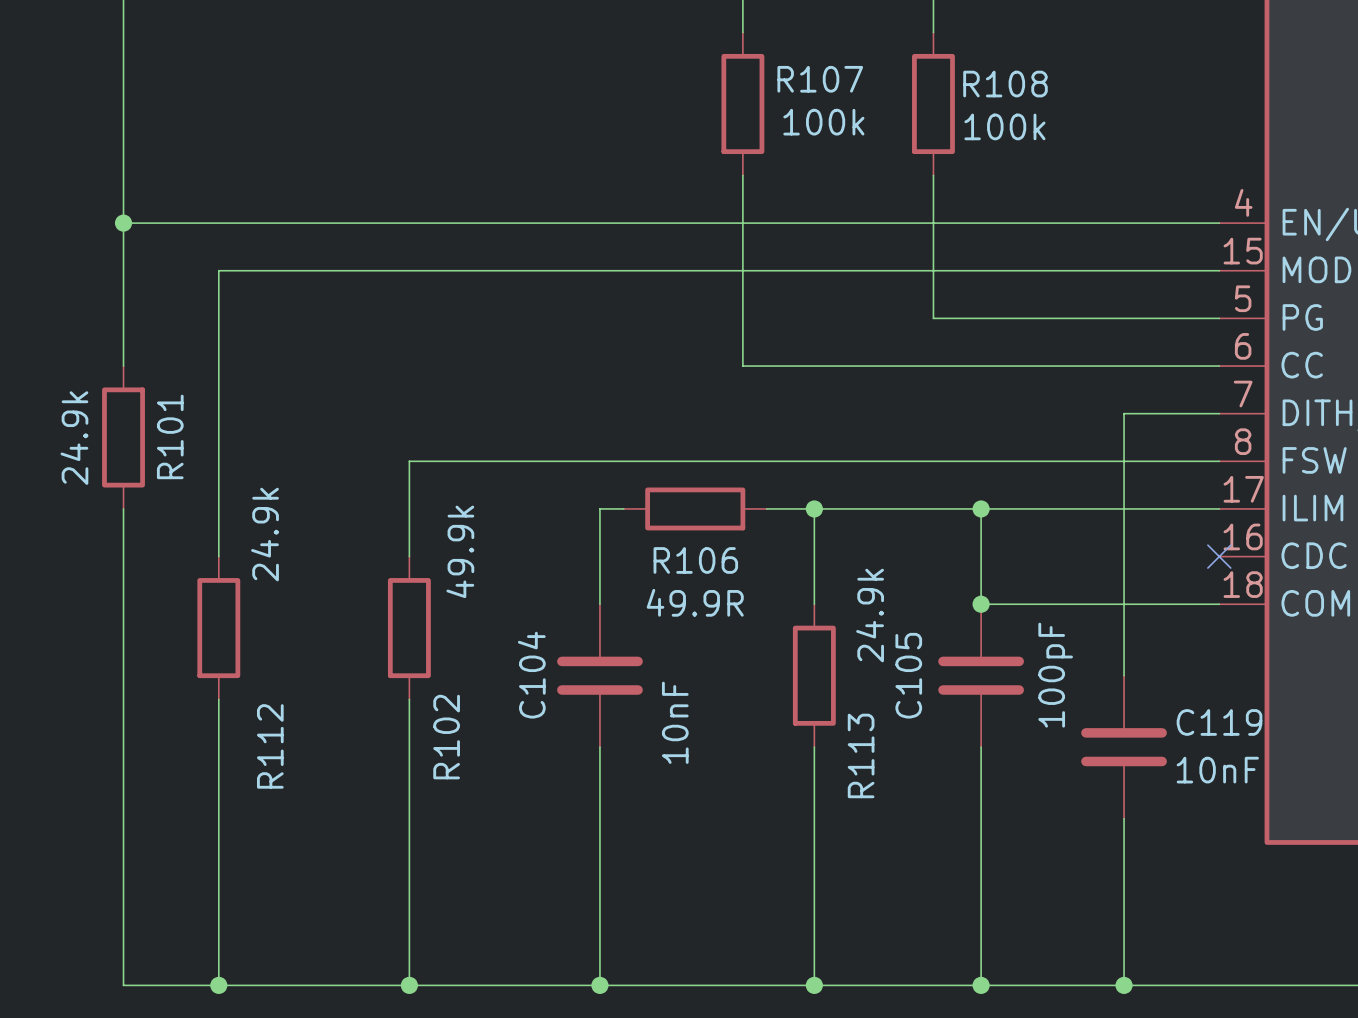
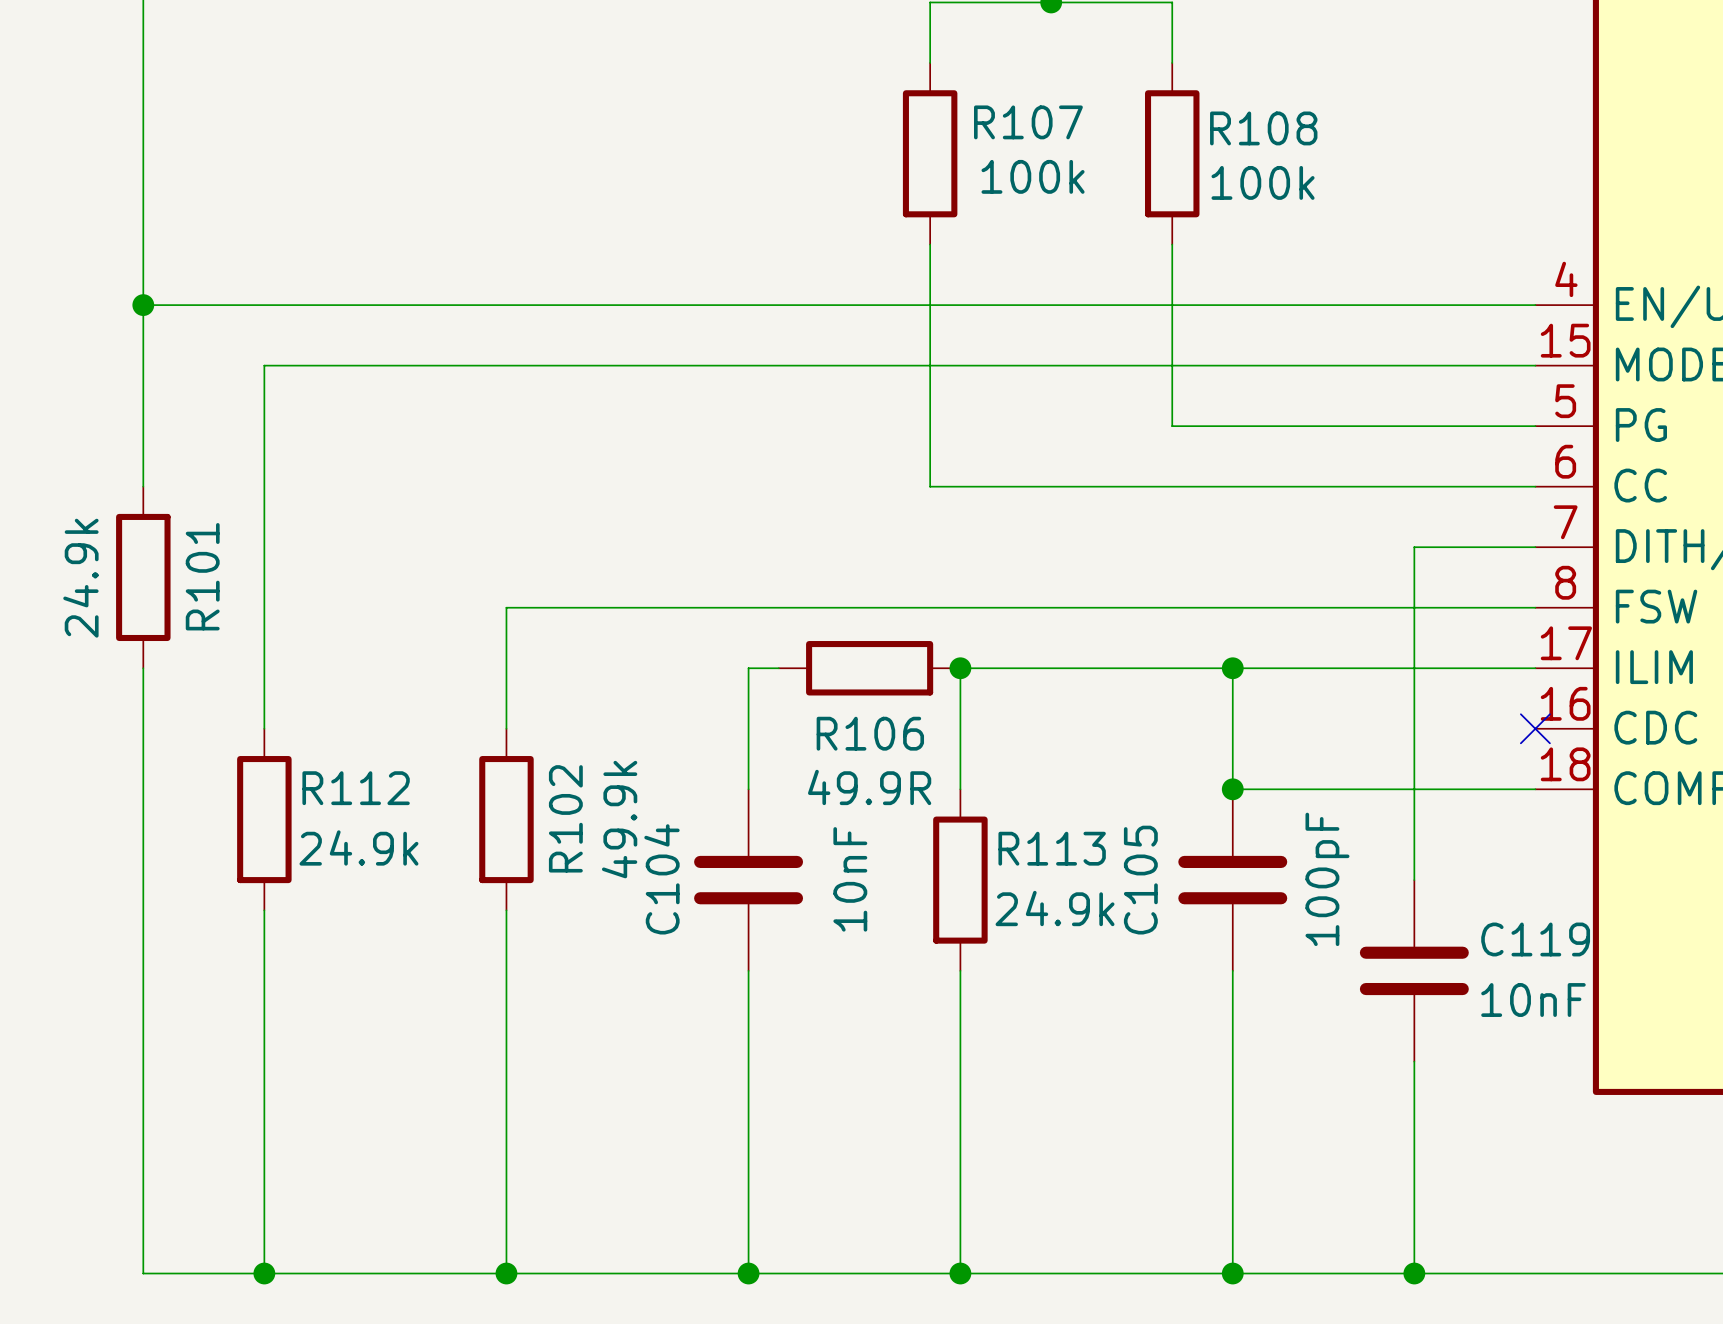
wire: (814, 508) (814, 604) -> (960, 668) (960, 789)
junction position: (814, 508) -> (960, 668)
R112 value rotation: 0° (264, 534) -> 90° clockwise (358, 847)
R112 value position: 24.9k (264, 534) -> 24.9k (358, 847)
R102 value position: 49.9k (460, 551) -> 49.9k (619, 819)
R113 value rotation: 0° (870, 615) -> 90° clockwise (1055, 908)
R113 position: (814, 675) -> (960, 880)
C104 value position: 10nF (675, 722) -> 10nF (850, 879)
R102 name position: R102 (446, 737) -> R102 (565, 818)
R112 name rotation: 0° (270, 746) -> 90° clockwise (356, 788)
R112 name position: R112 (270, 746) -> R112 (356, 788)
wire: (814, 747) (814, 985) -> (960, 970) (960, 1273)
R113 name rotation: 0° (861, 755) -> 90° clockwise (1052, 848)
junction position: (814, 985) -> (960, 1273)

